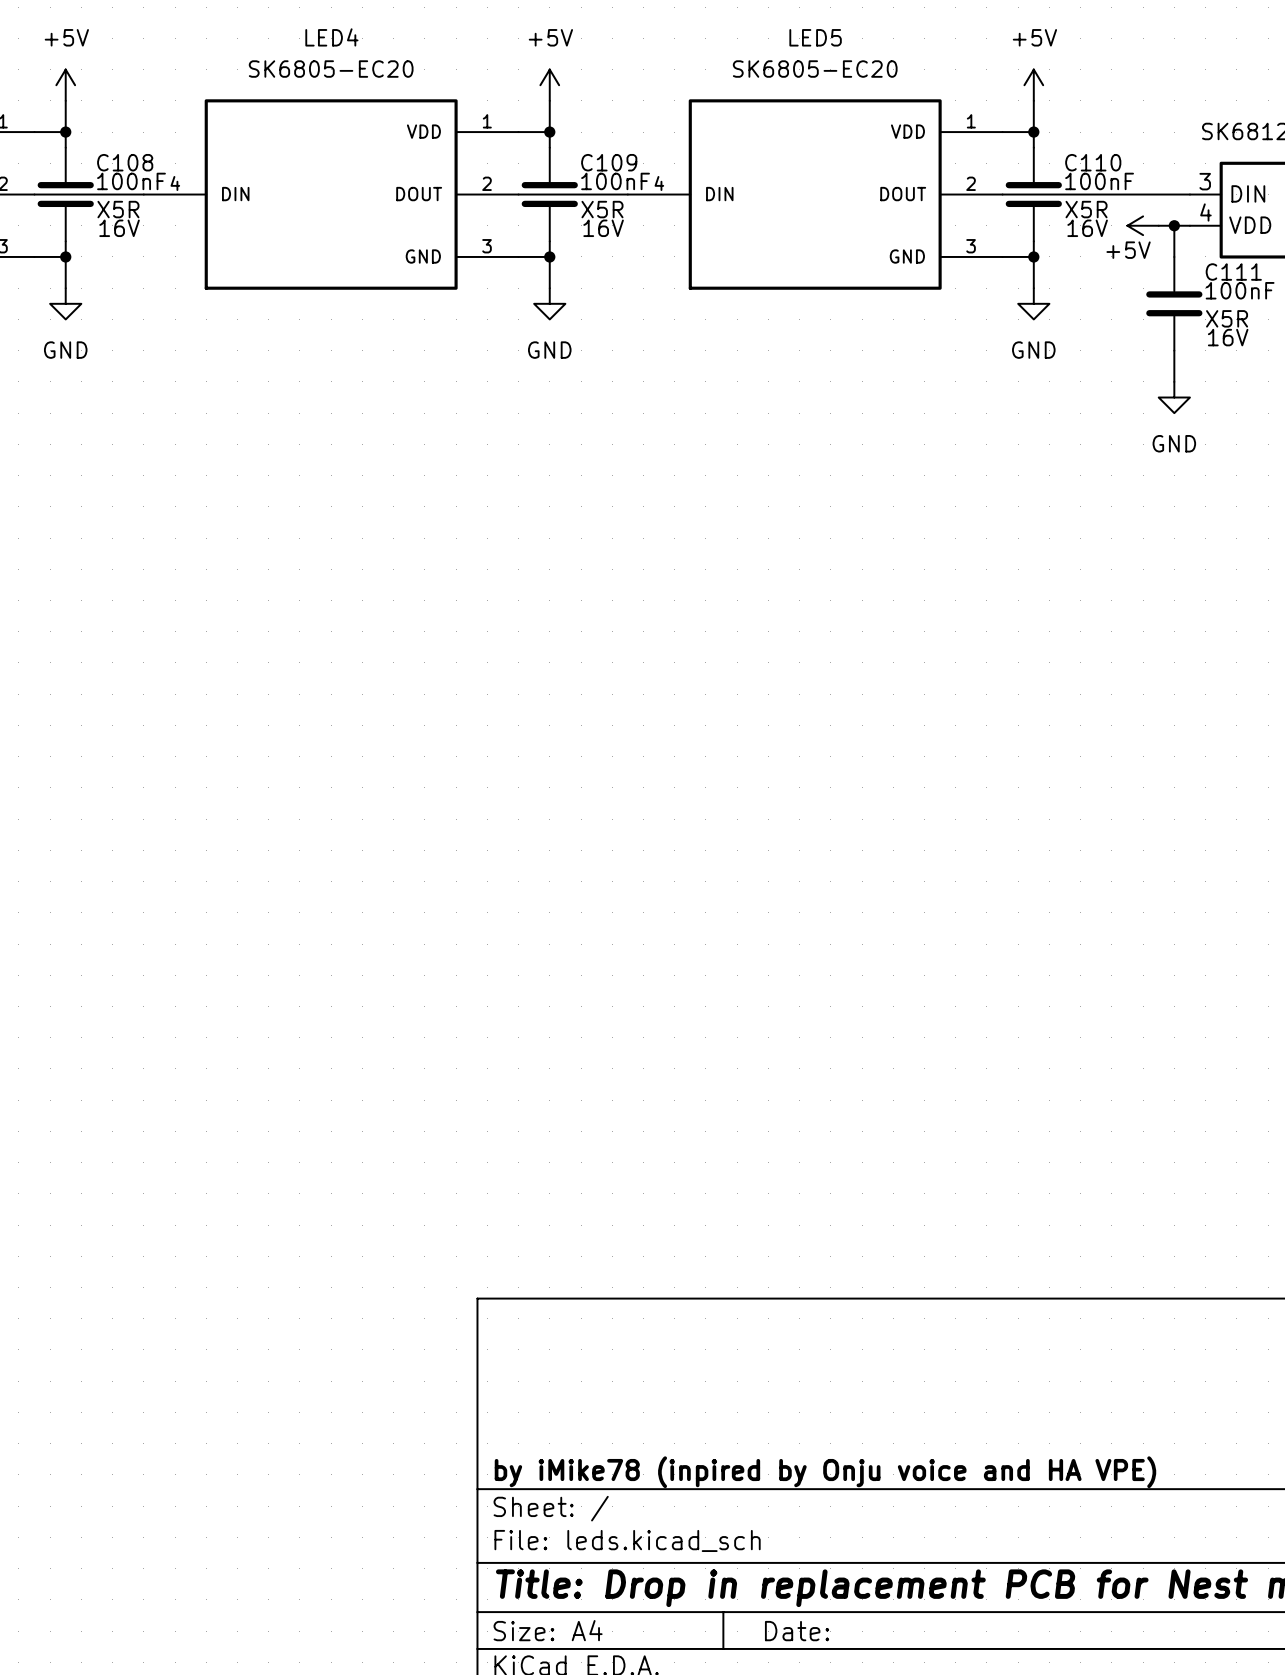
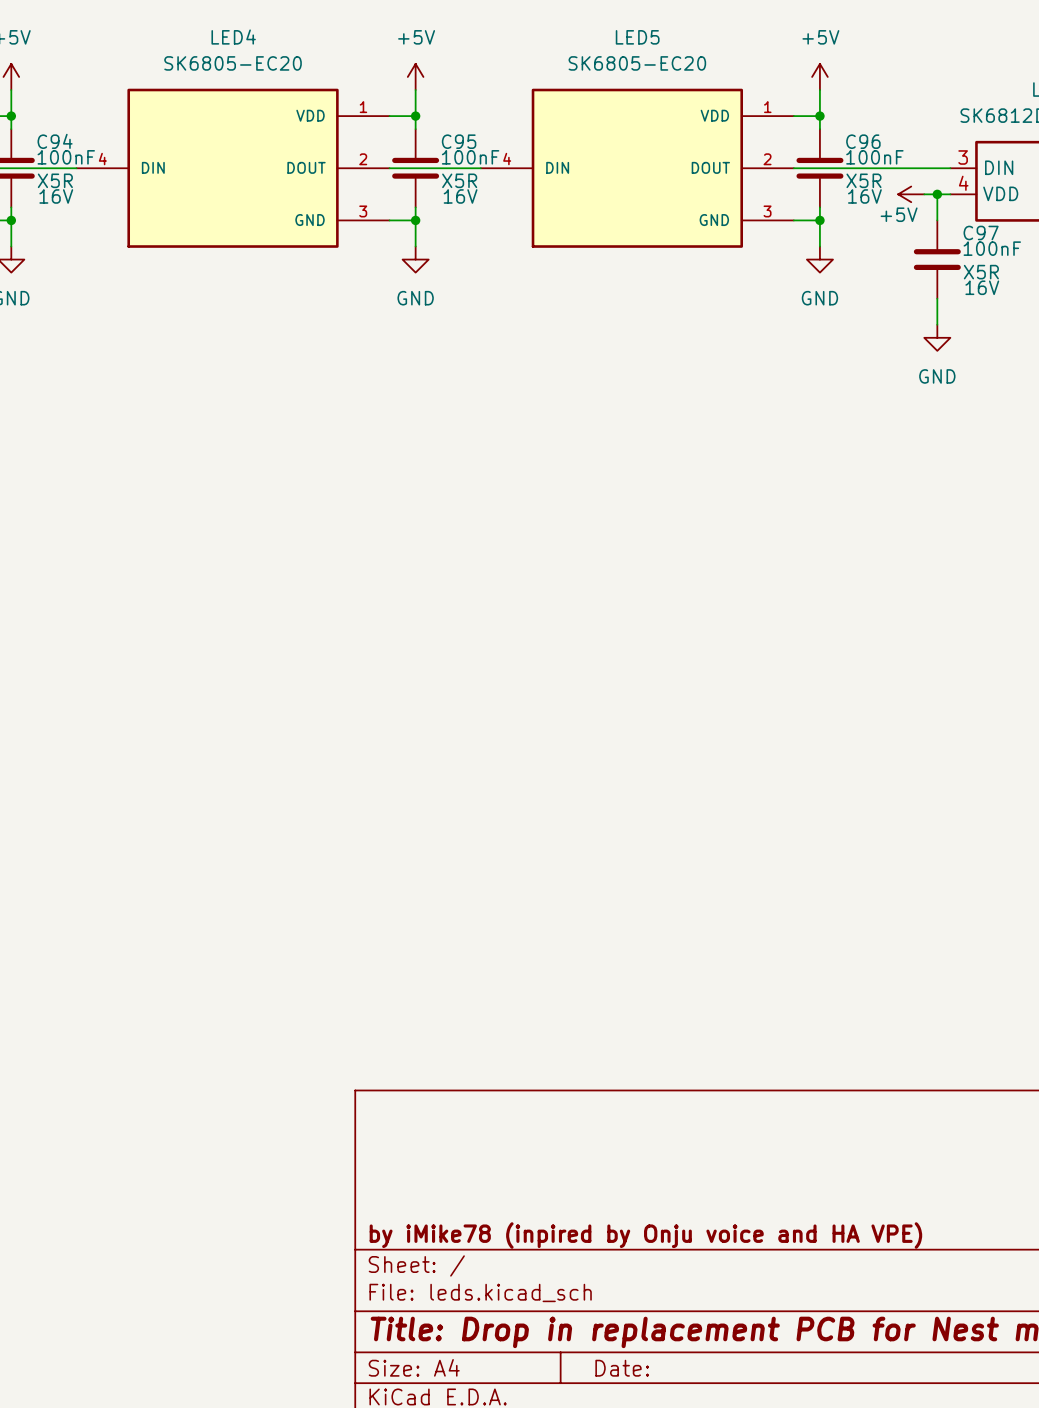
C108 name: C108 (125, 162) -> C94 (55, 141)
C109 name: C109 (609, 162) -> C95 (459, 141)
C110 name: C110 (1093, 162) -> C96 (863, 141)
C111 name: C111 (1233, 272) -> C97 (981, 232)

